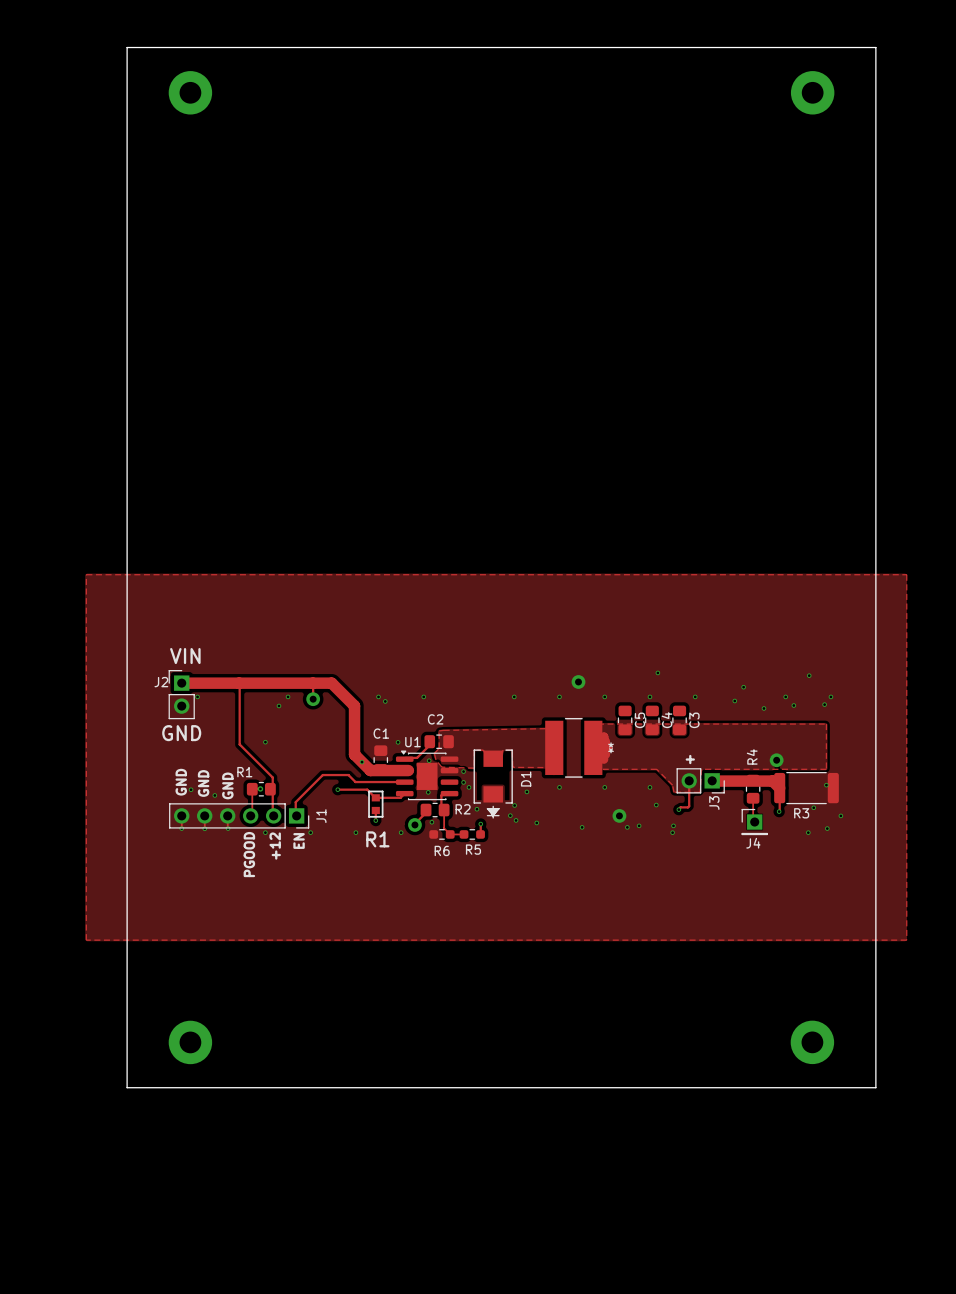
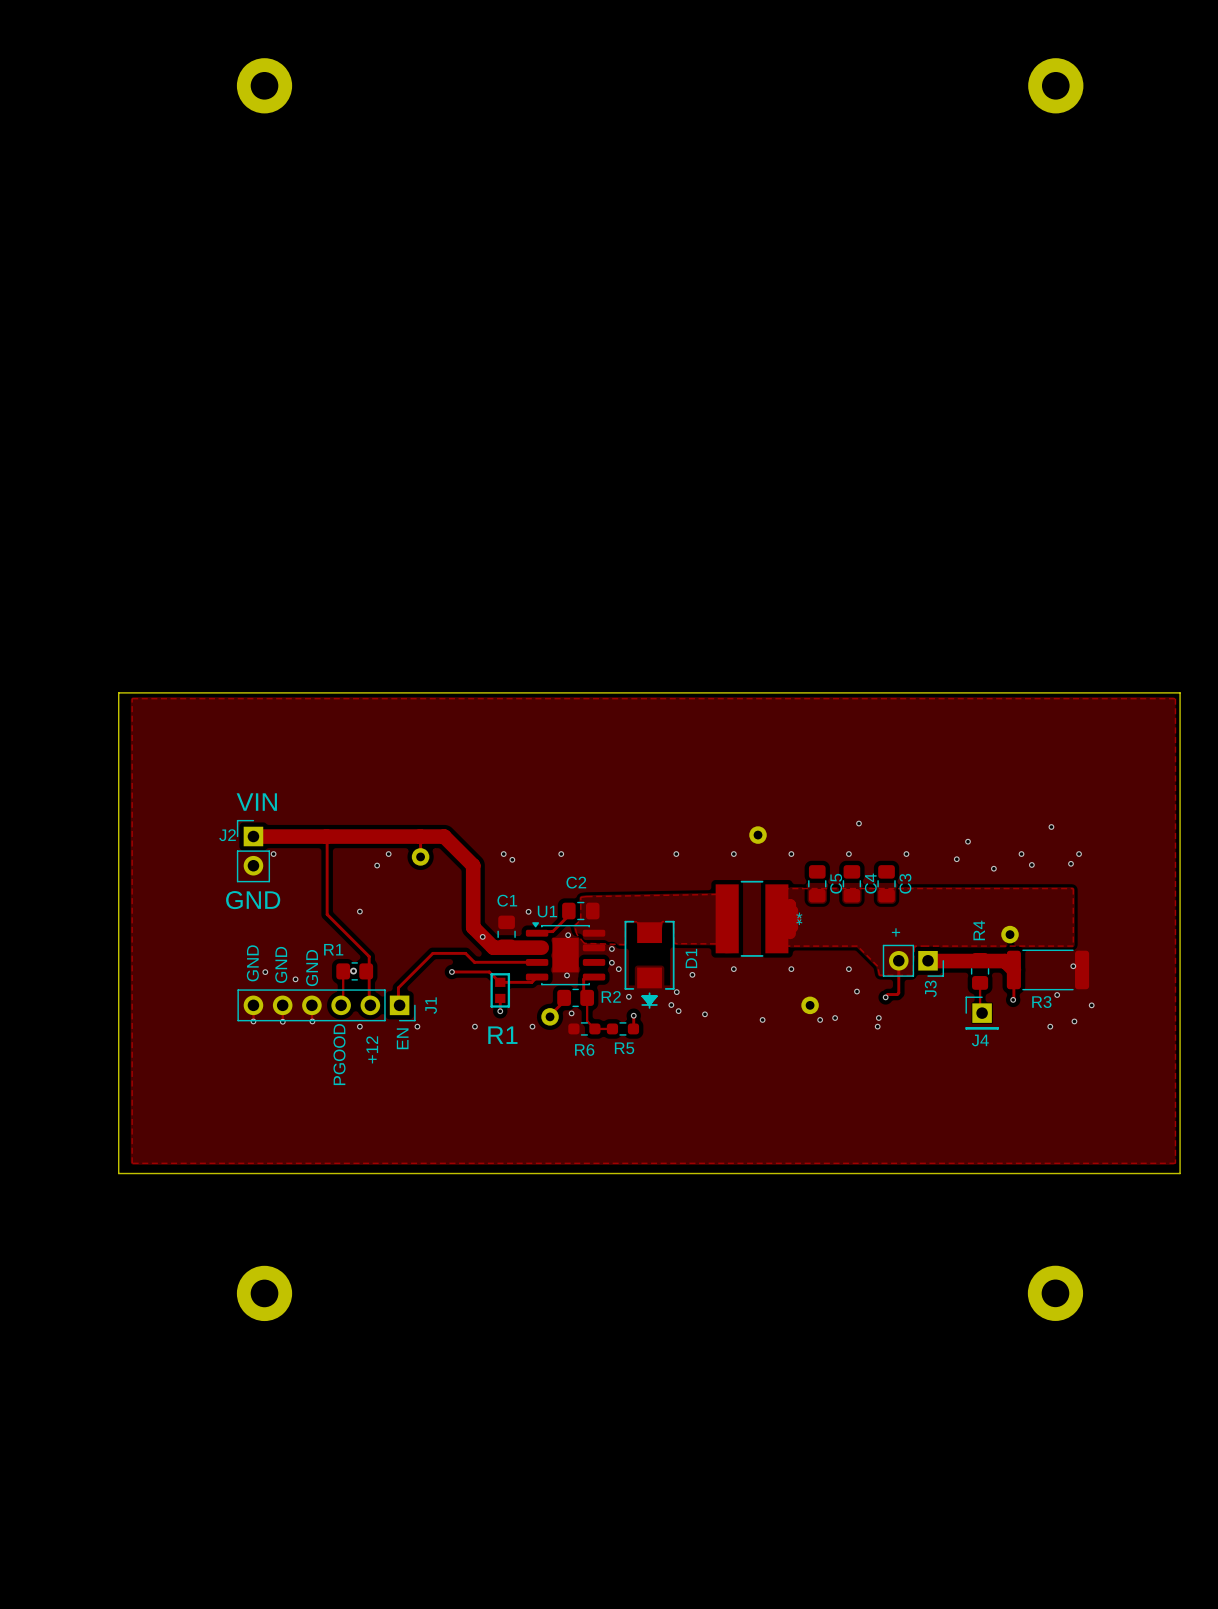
board edge: (127, 47) (875, 47) (875, 1087) (127, 1087) (127, 47) -> none
board edge: none -> (118, 692) (1180, 692) (1180, 1173) (118, 1173) (118, 692)

